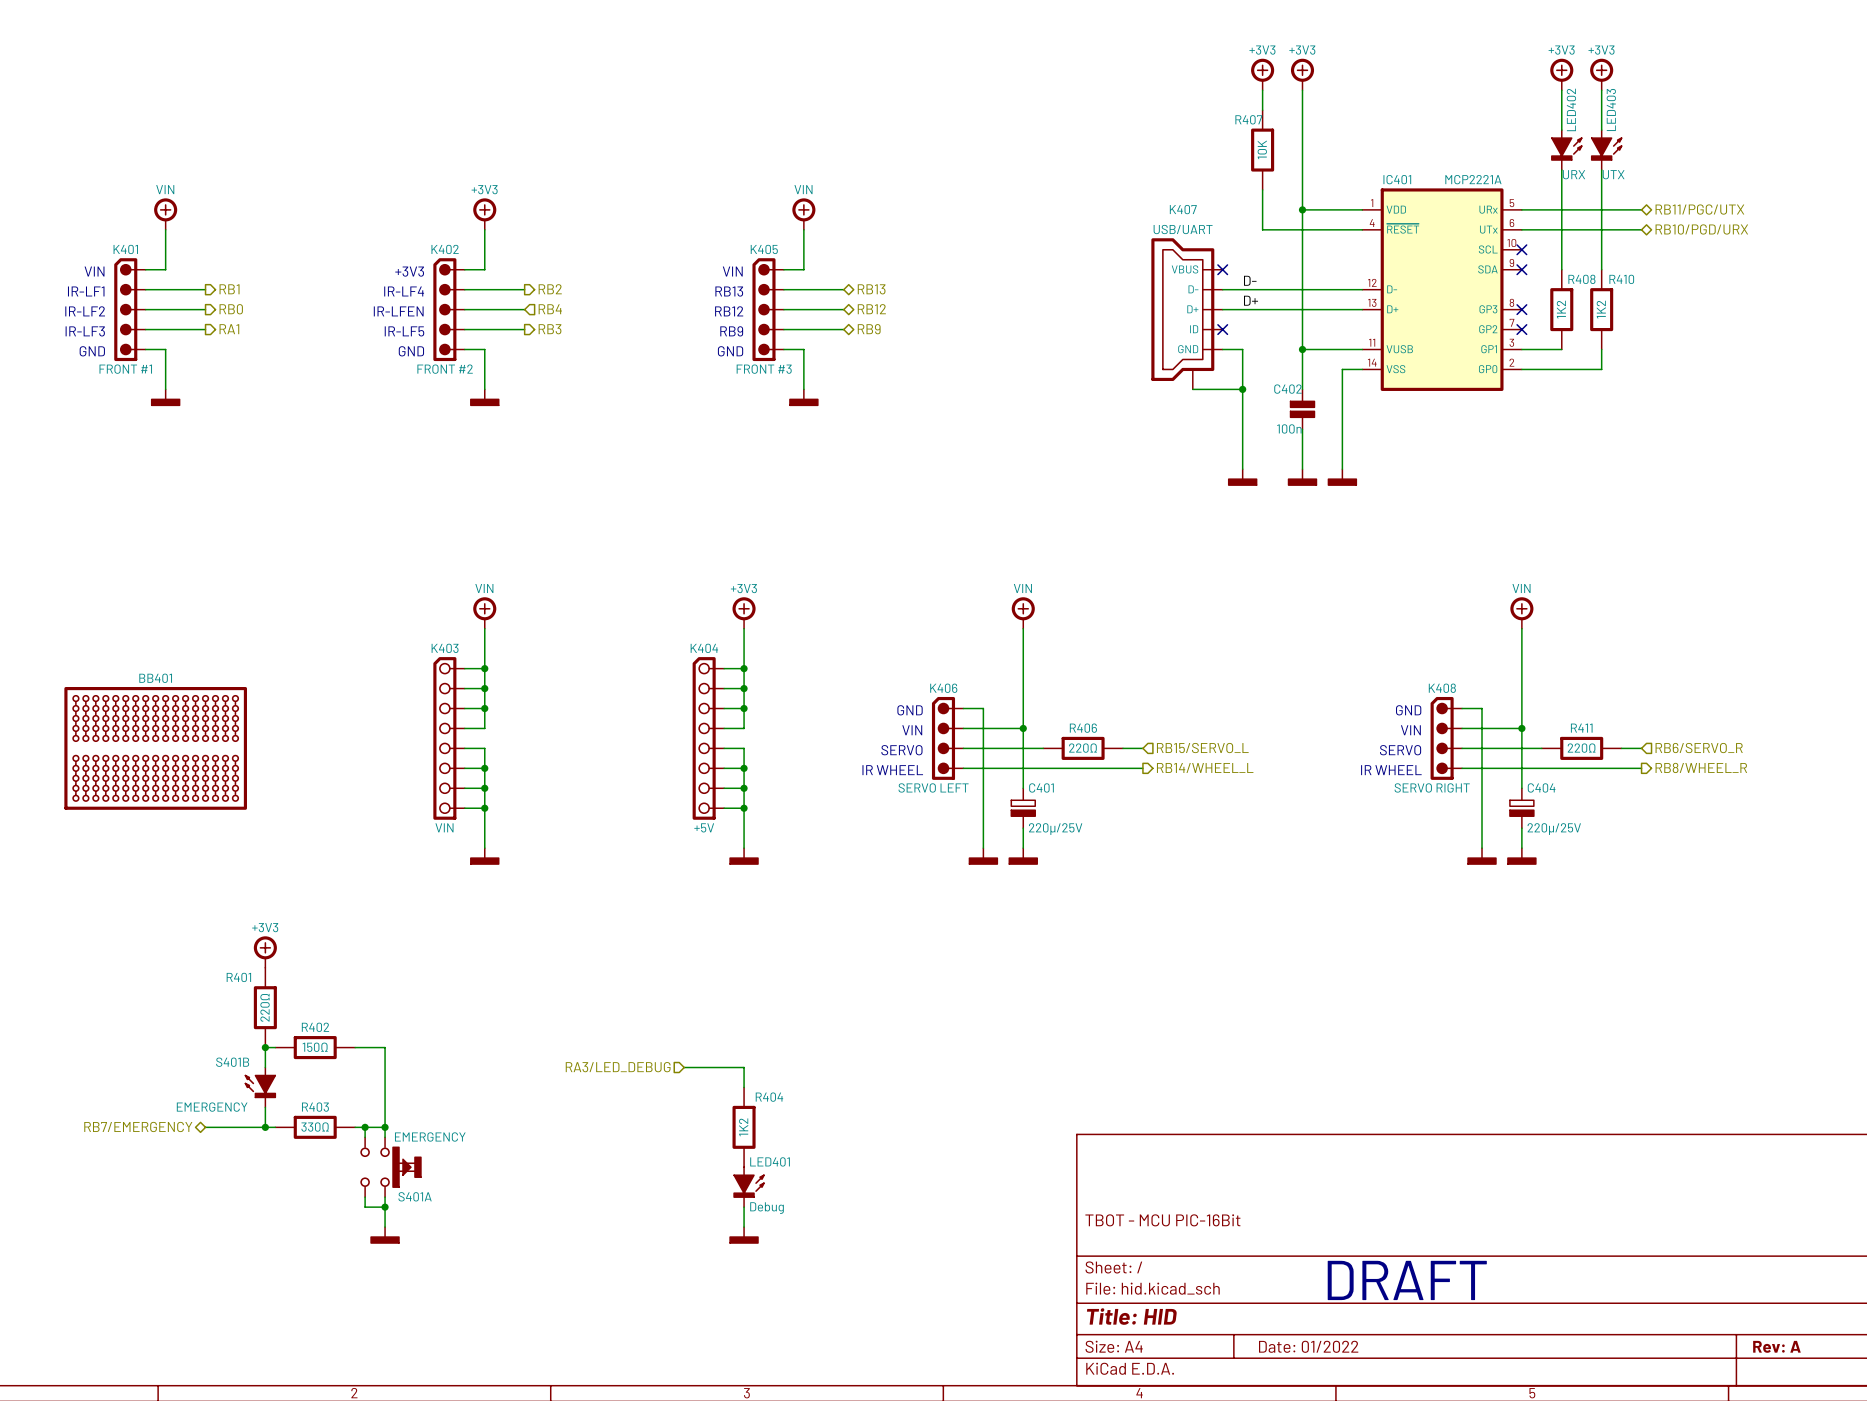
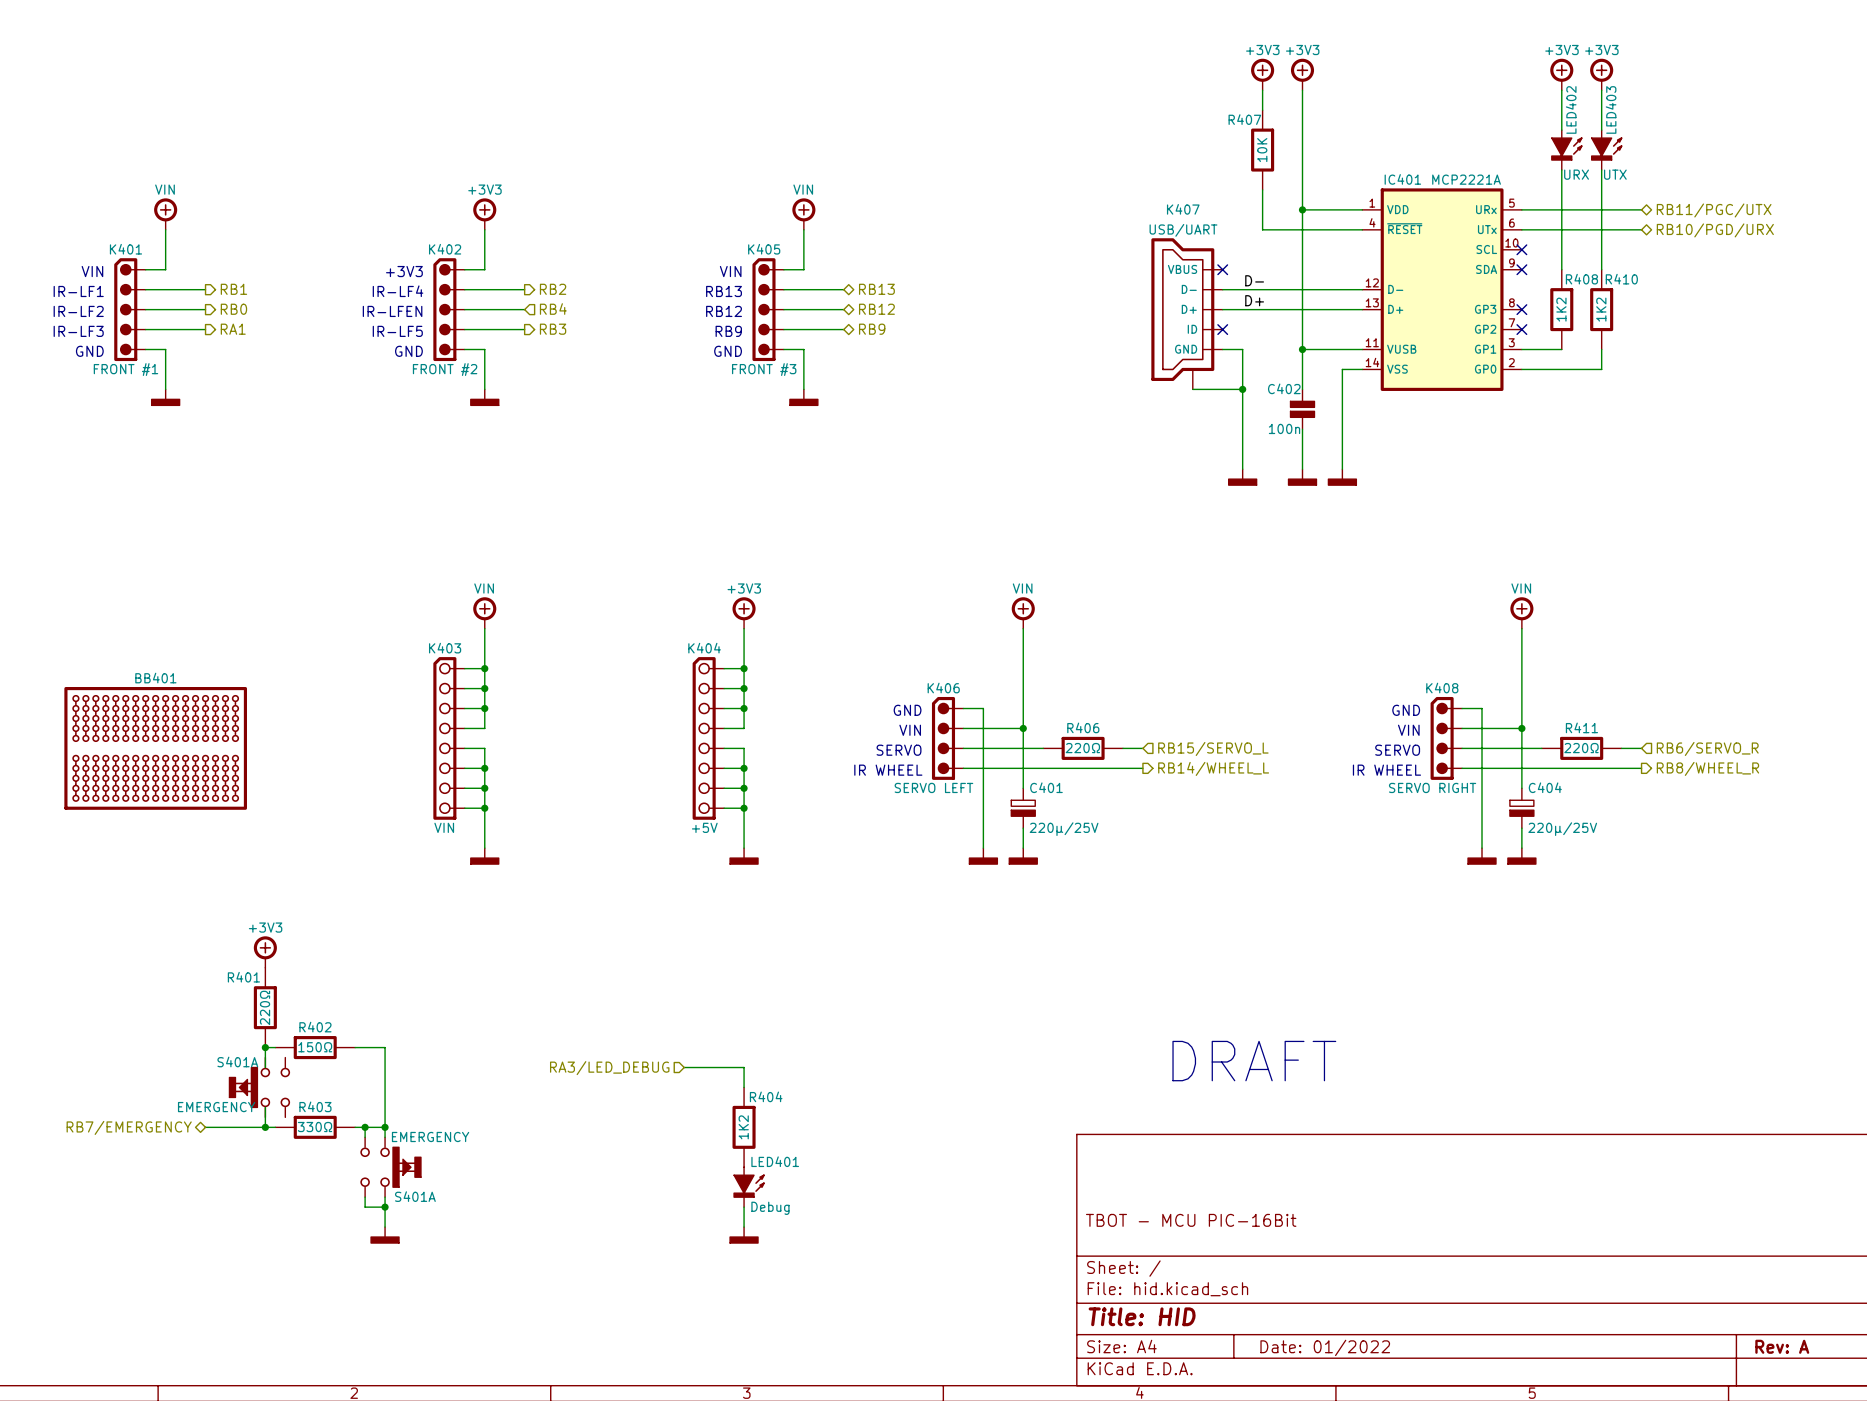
text: none -> DRAFT (1254, 1061)
S401B: EMERGENCY (259, 1087) -> none
S401A: none -> EMERGENCY (259, 1087)
text: DRAFT (1407, 1280) -> none

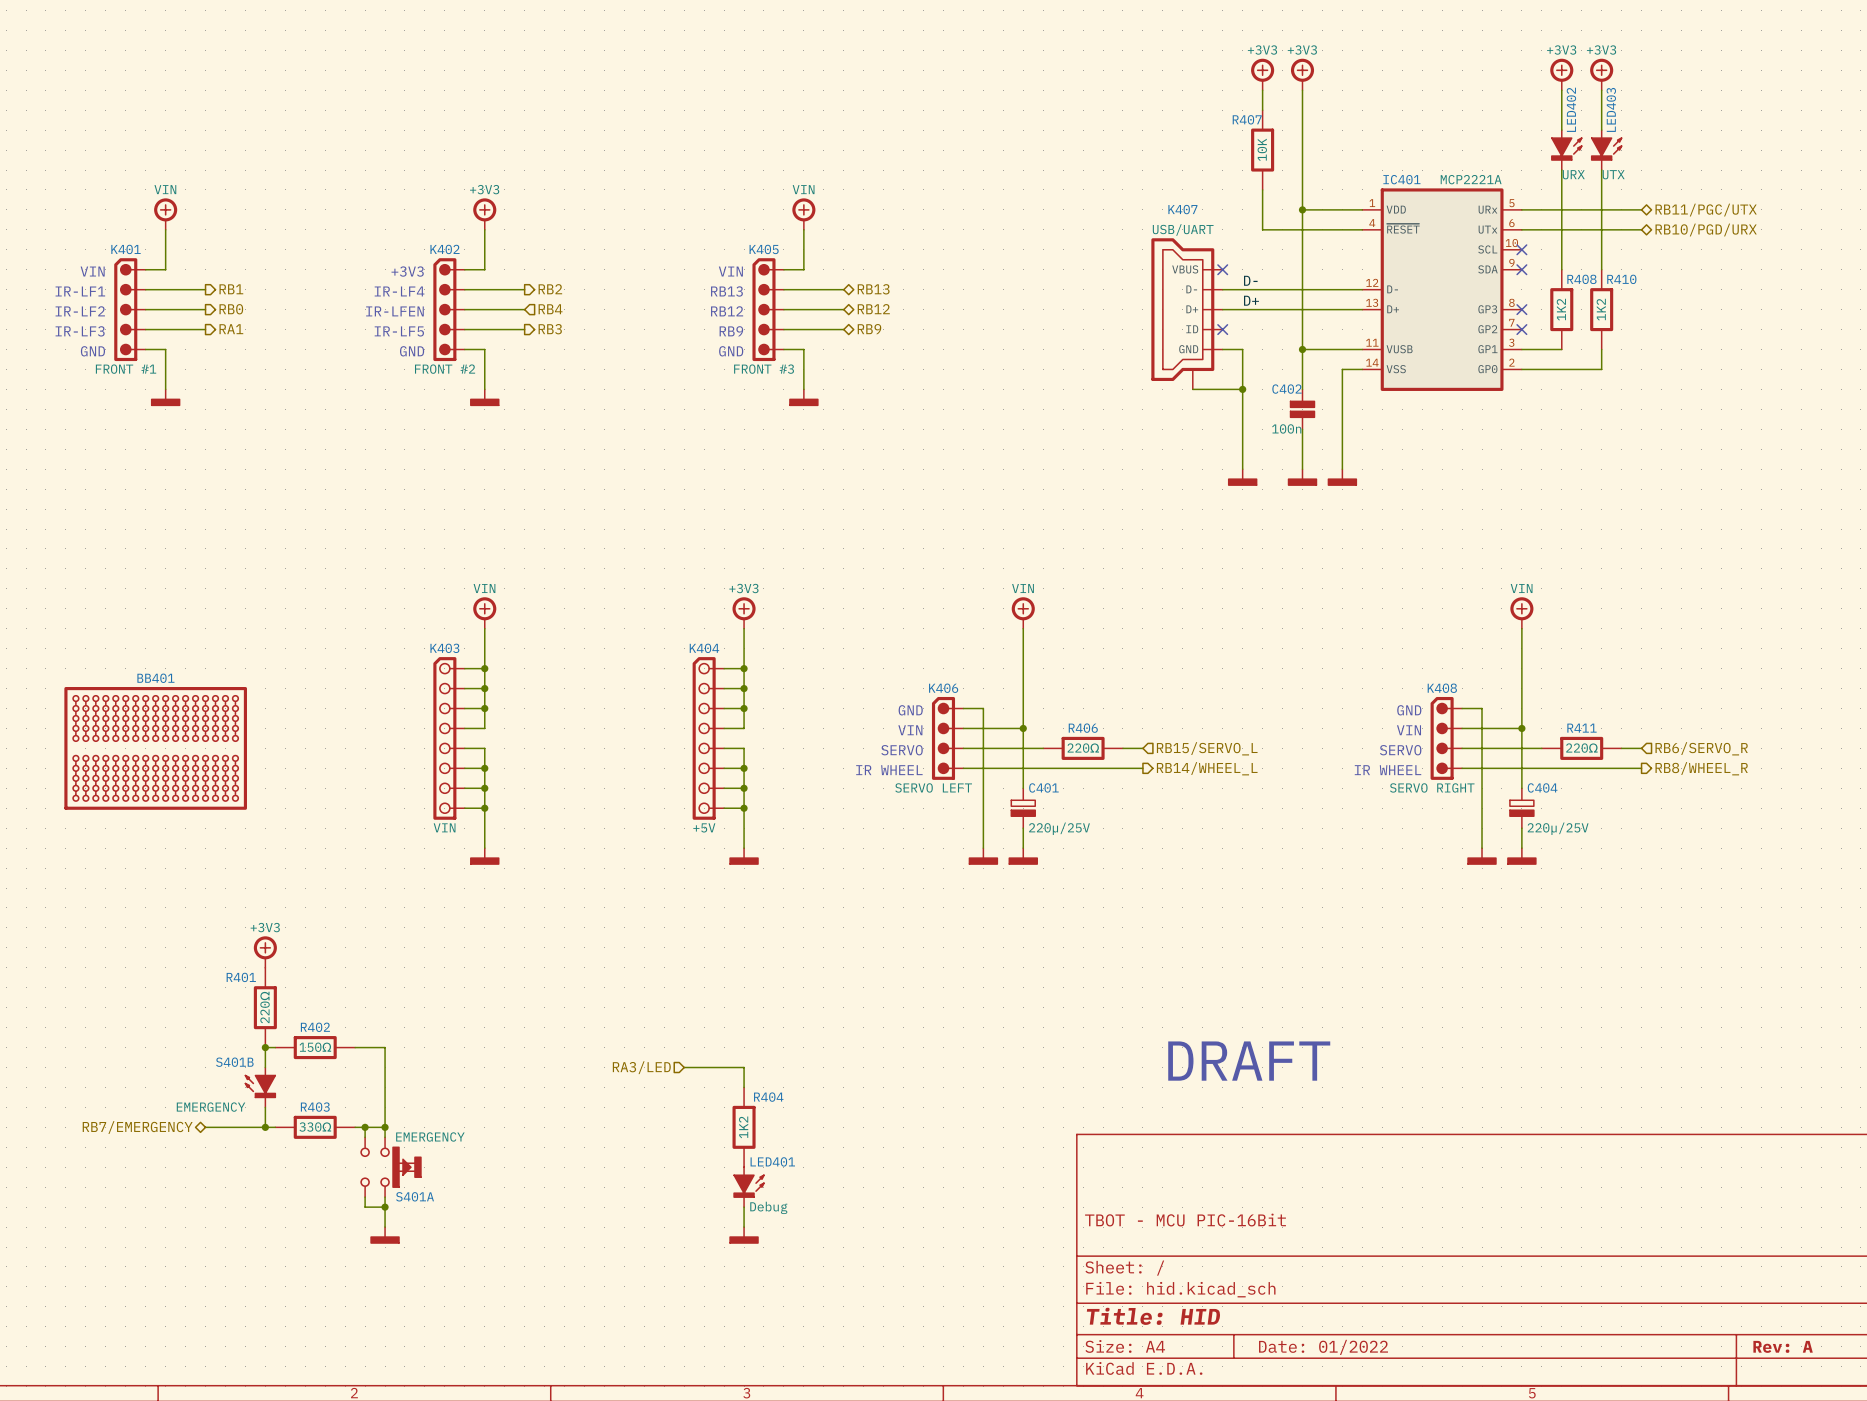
hierarchical label: RA3/LED_DEBUG (609, 1068) -> RA3/LED (641, 1067)
S401A: EMERGENCY (259, 1087) -> none
S401B: none -> EMERGENCY (259, 1087)

